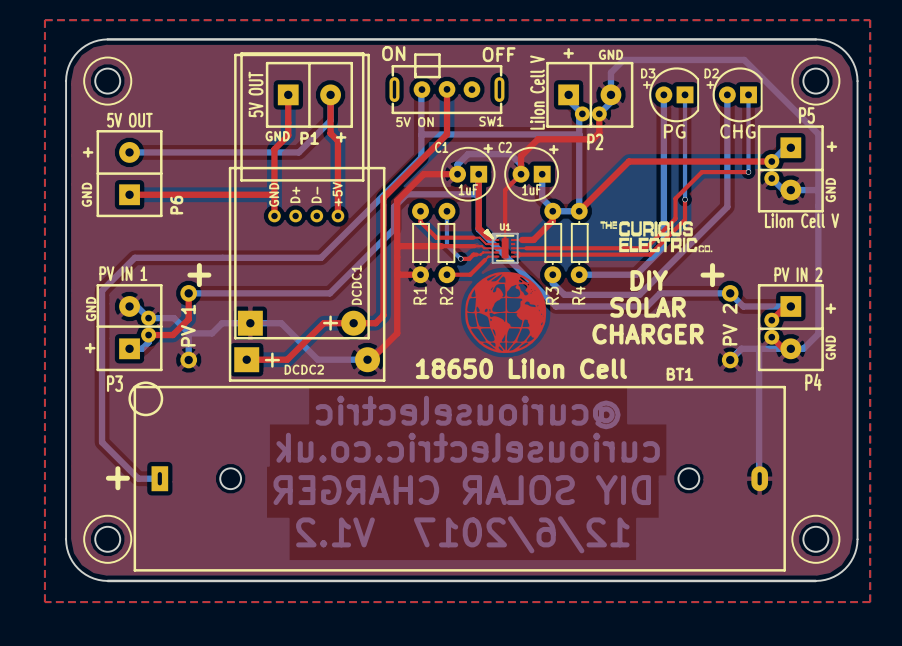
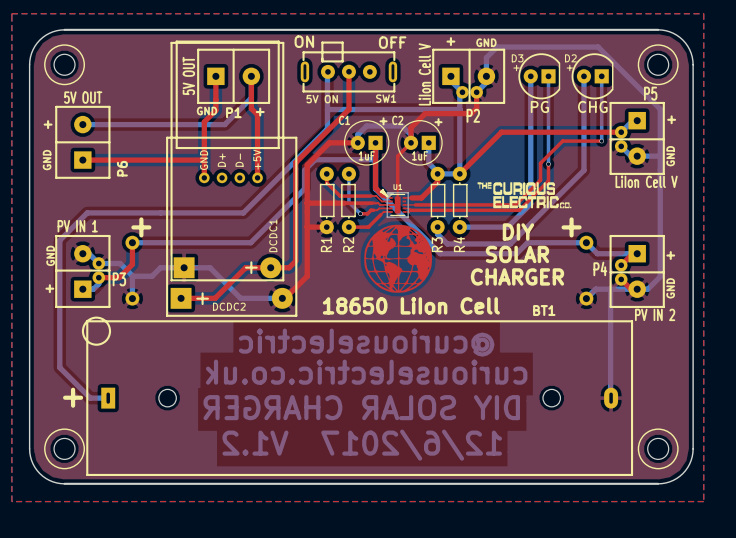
P4 value position: PV IN 2 (798, 274) -> PV IN 2 (655, 314)
text: PV 2 (730, 324) -> none
text: PV 1 (188, 325) -> none
P4 name position: P4 (813, 382) -> P4 (600, 268)
P3 name position: P3 (114, 383) -> P3 (119, 279)

